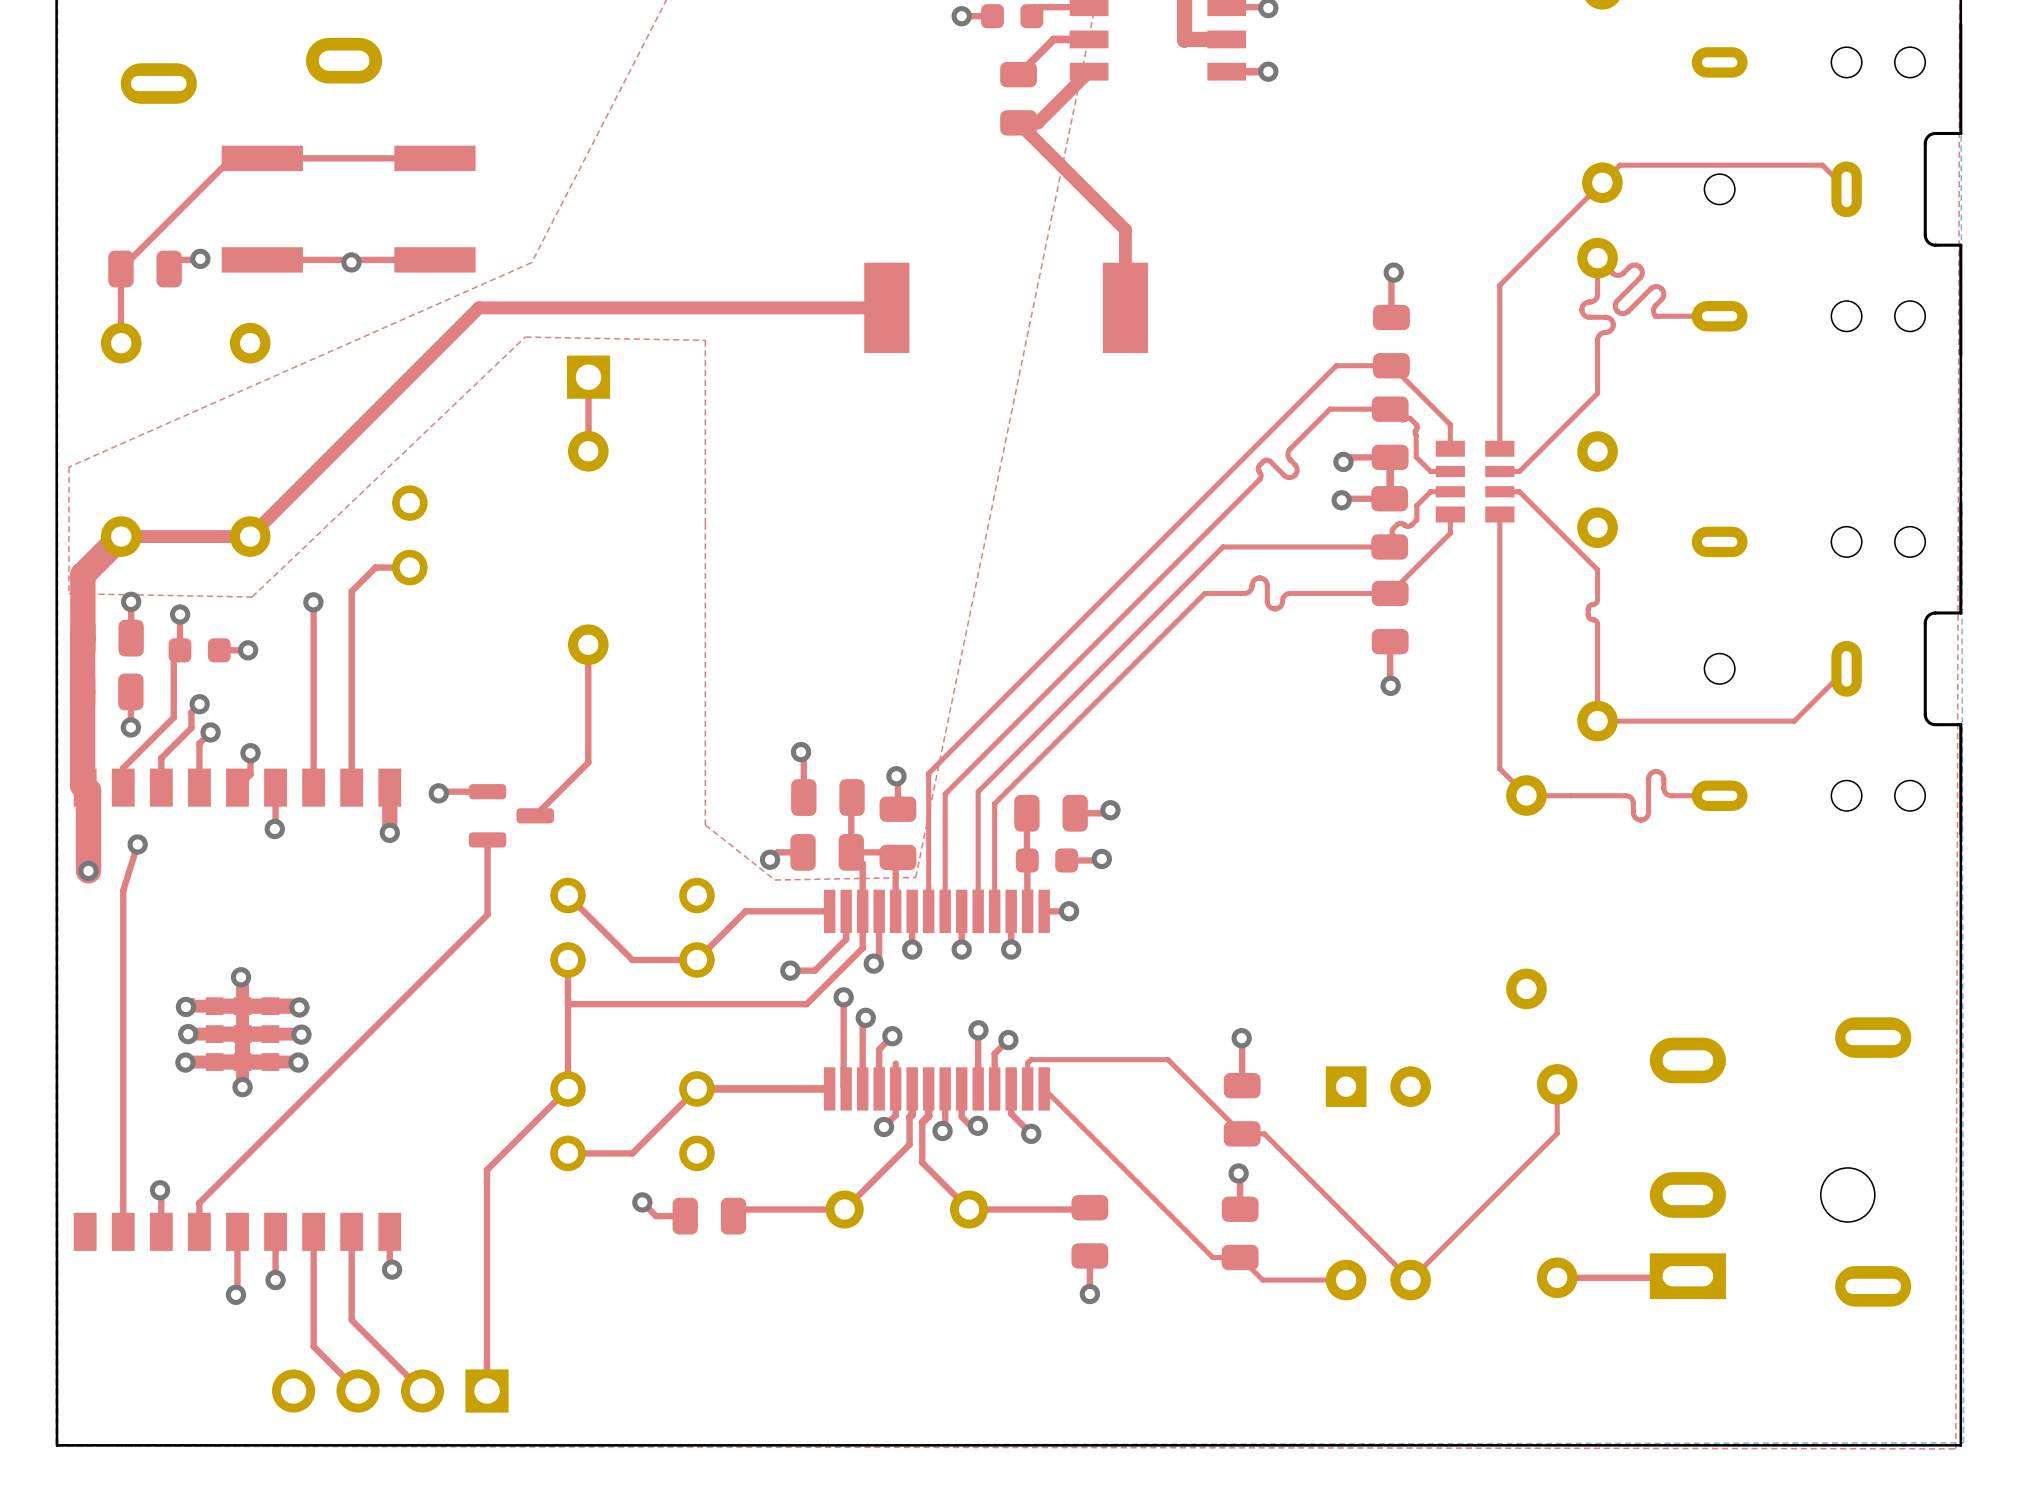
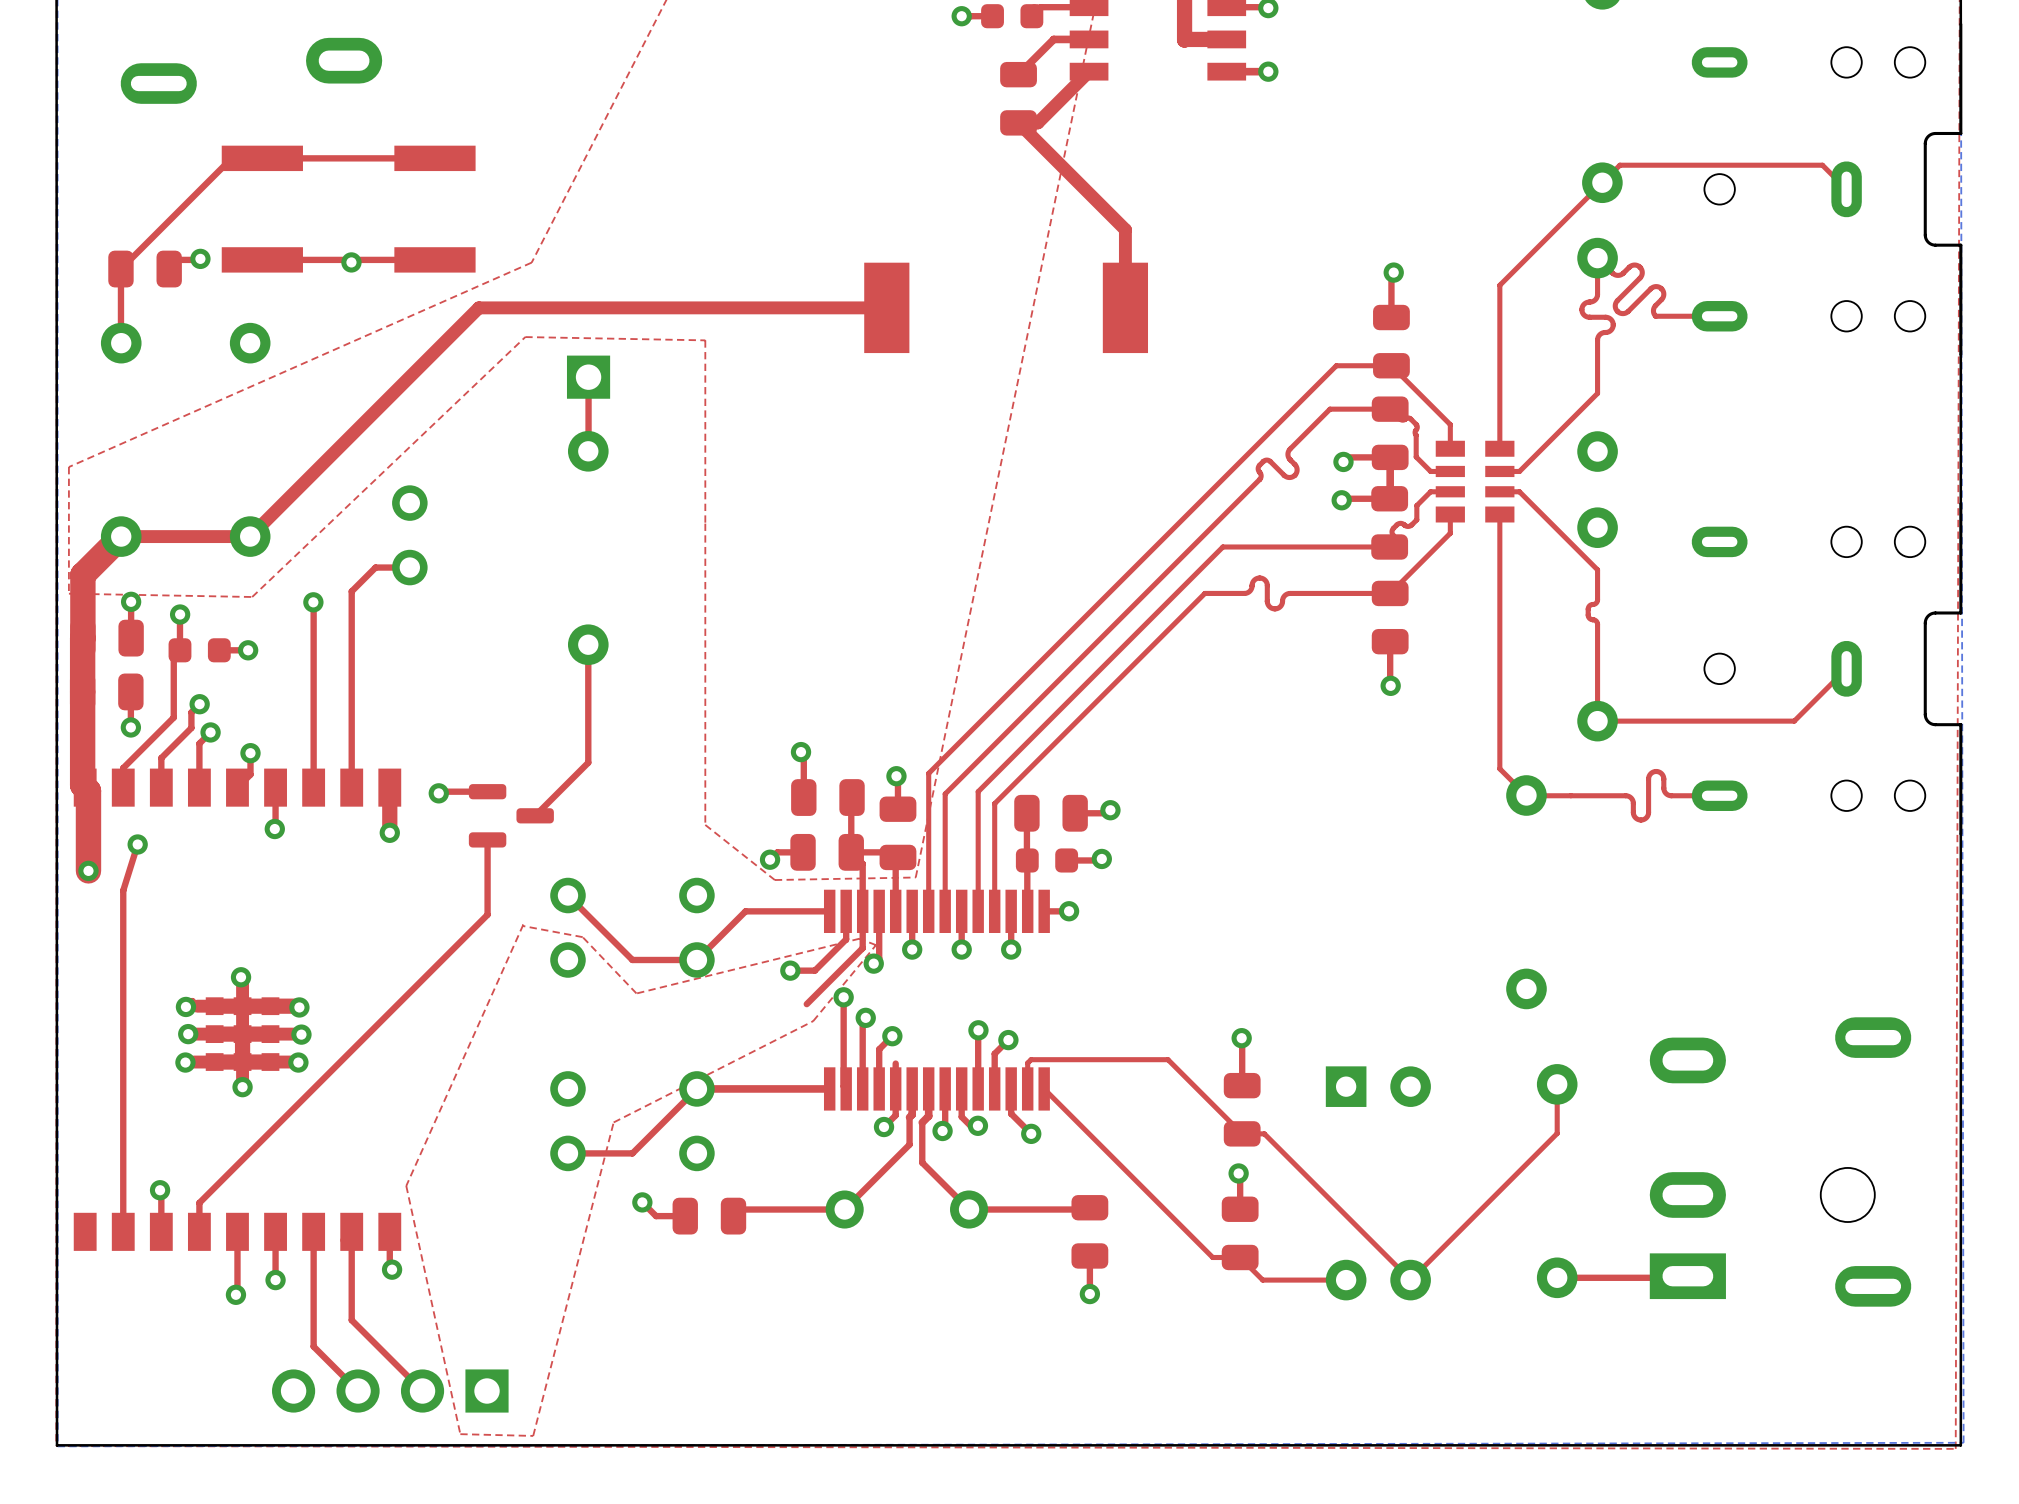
top zone outline: none -> (523, 924) (406, 1185) (460, 1434) (533, 1435) (613, 1122) (813, 1021) (876, 945) (859, 938) (636, 993) (582, 937) (523, 924)
top track: (567, 959) (567, 1088) (487, 1169) (487, 1391) -> none
top track: (806, 1004) (567, 1004) -> none

